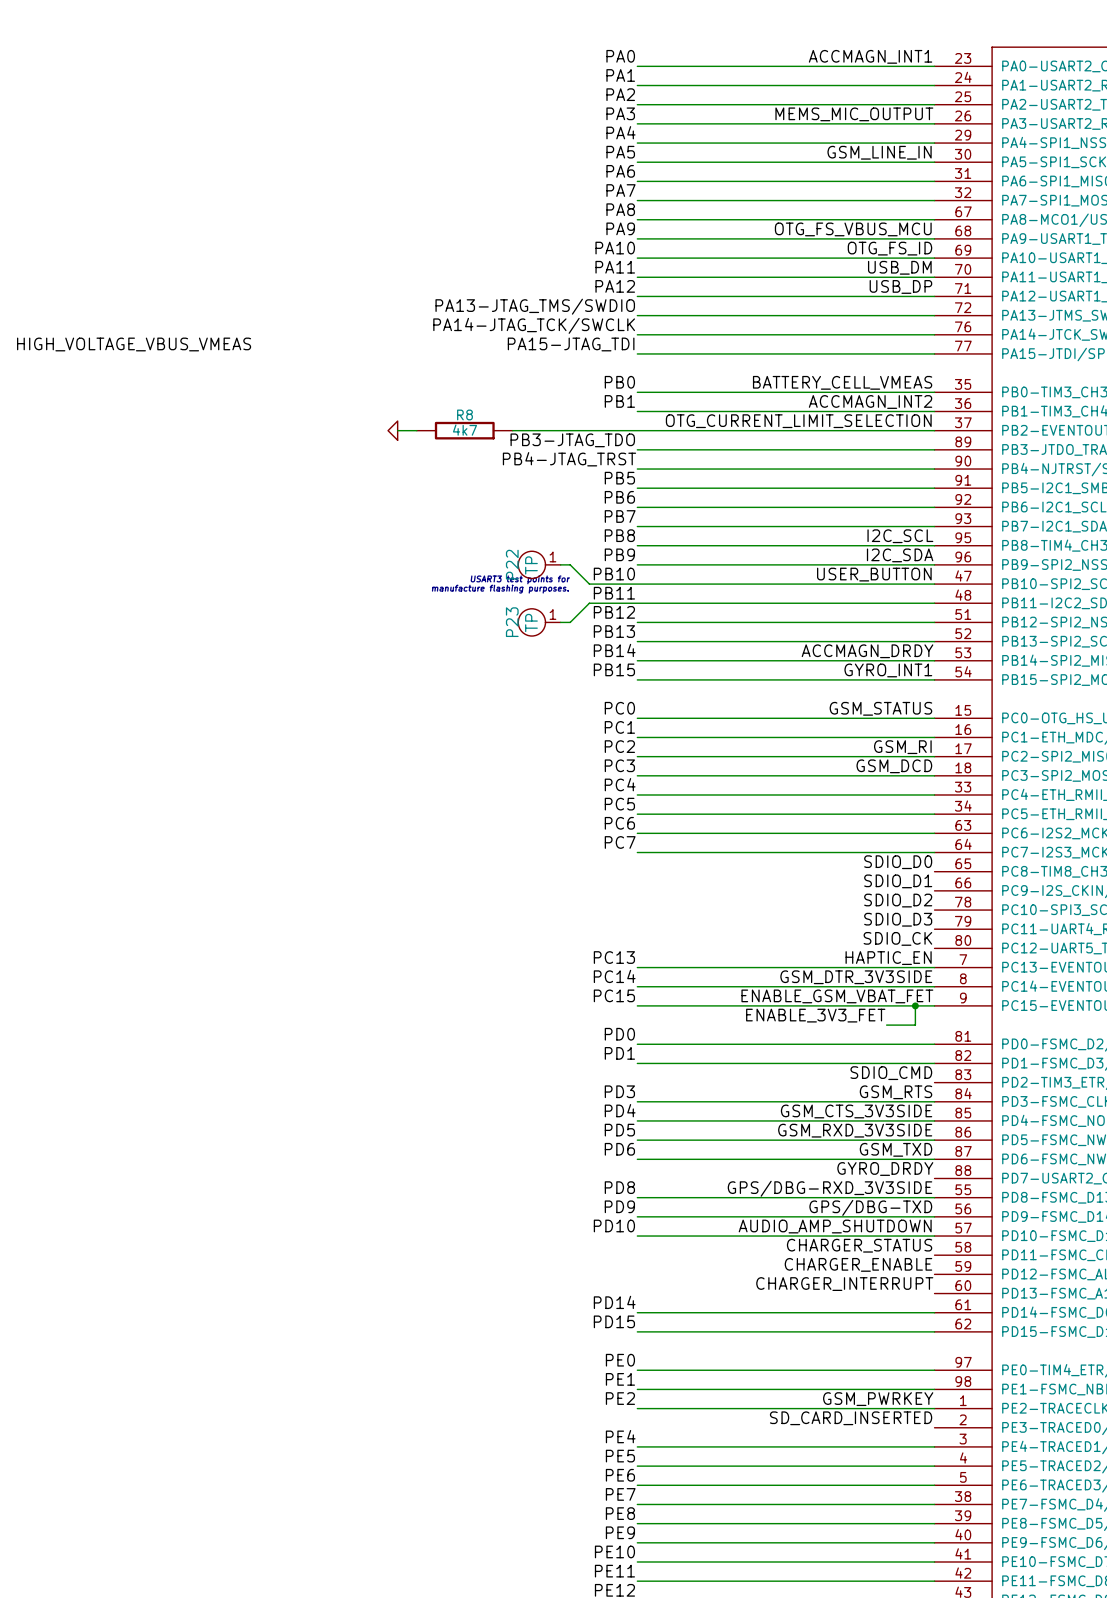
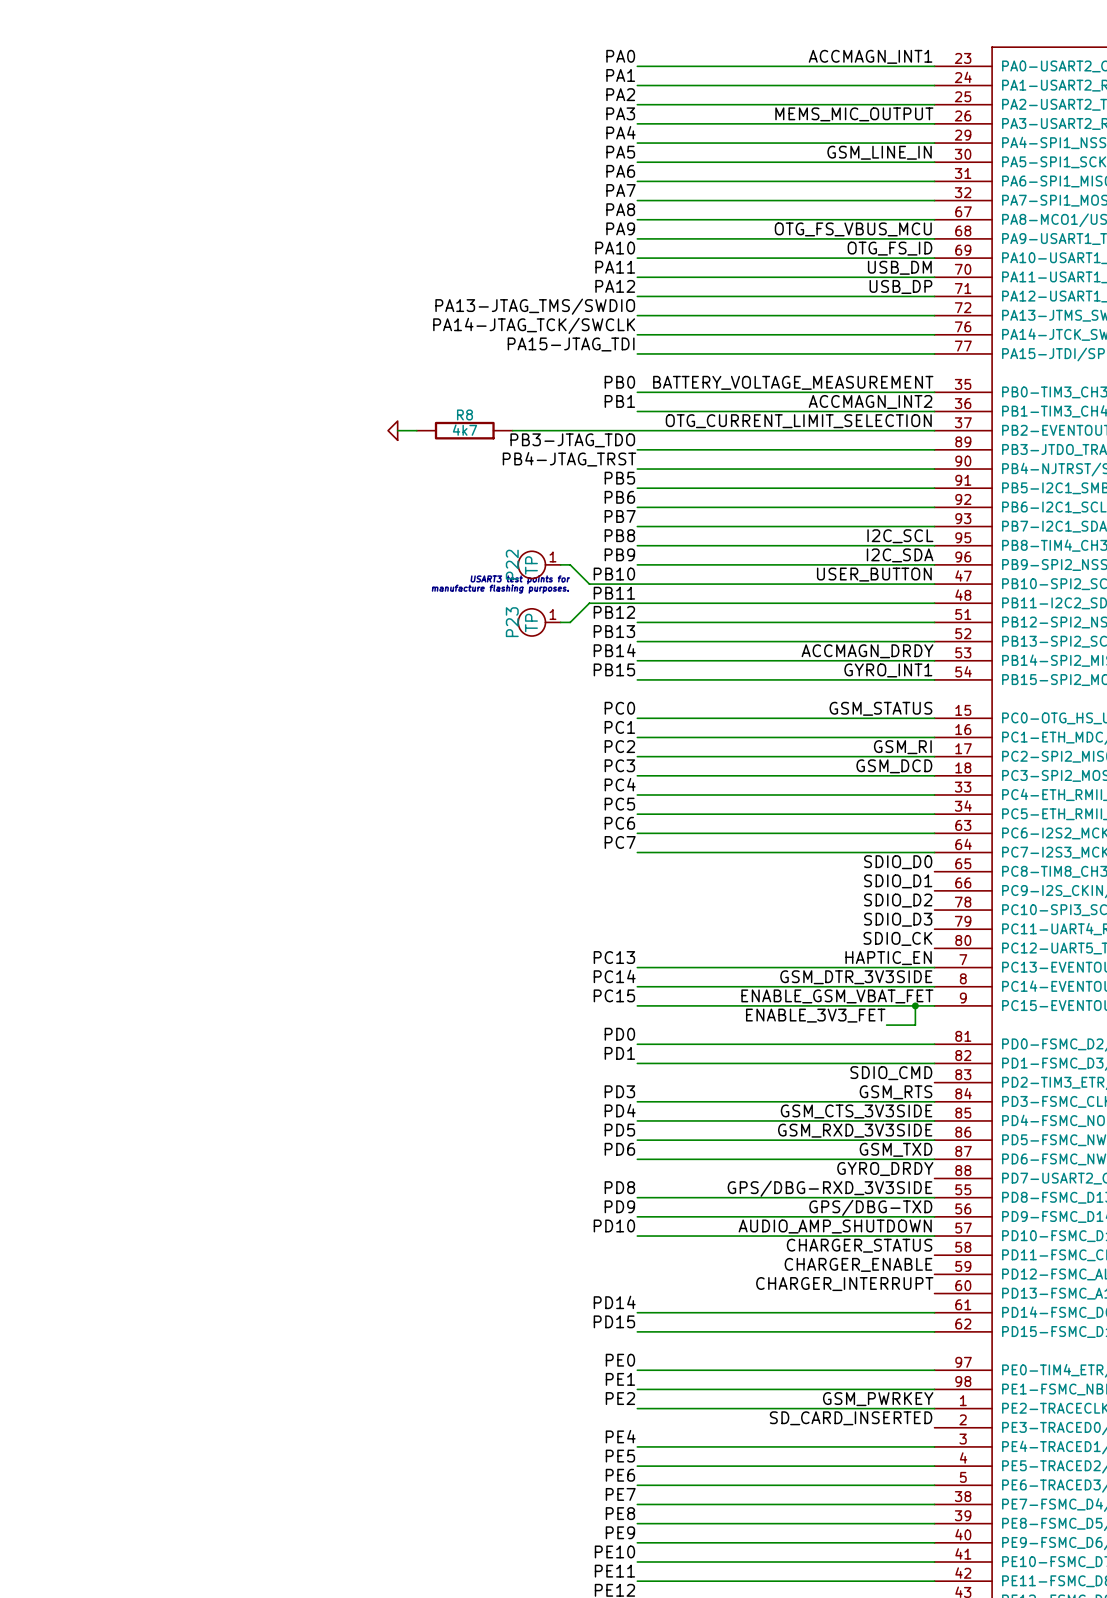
label: HIGH_VOLTAGE_VBUS_VMEAS (134, 344) -> none
label: BATTERY_CELL_VMEAS (842, 382) -> BATTERY_VOLTAGE_MEASUREMENT (793, 382)

